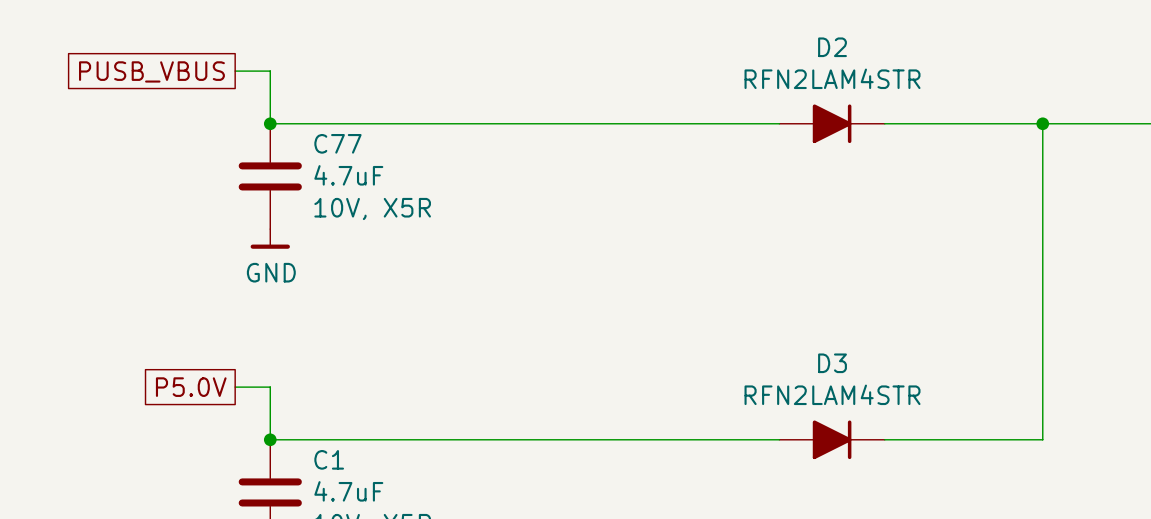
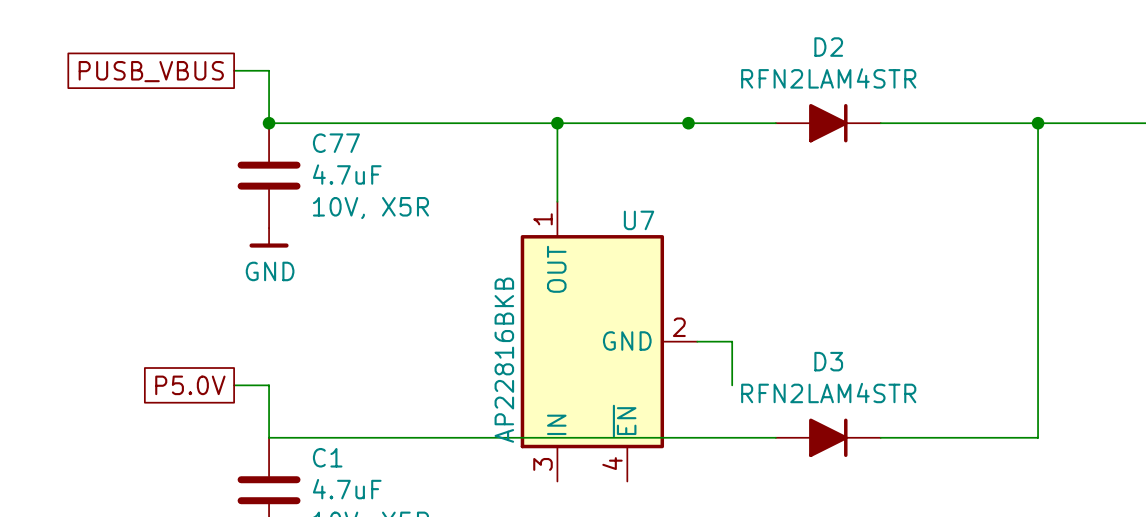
wire: none -> (557, 123) (557, 201)
junction: none -> (557, 123)
junction: none -> (688, 123)
U7: none -> AP22816BKB (608, 341)
wire: none -> (697, 341) (732, 341) (732, 385)
junction: (270, 439) -> none

